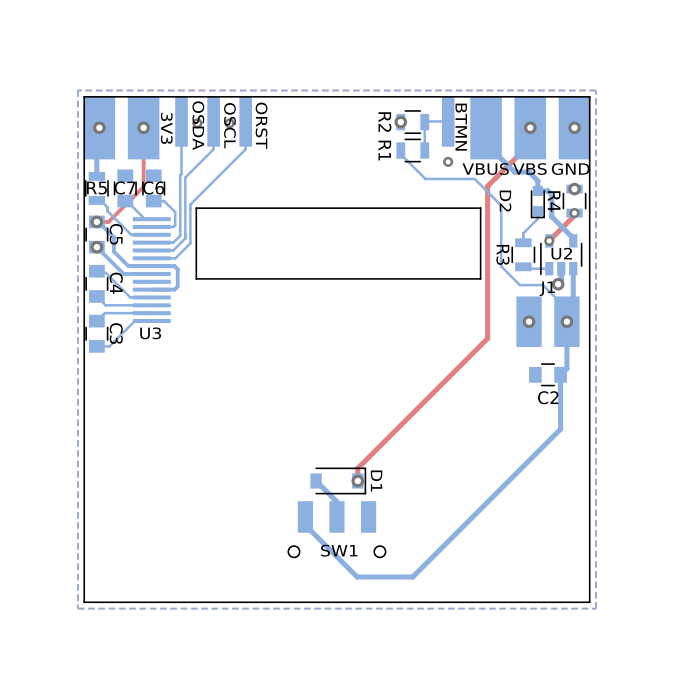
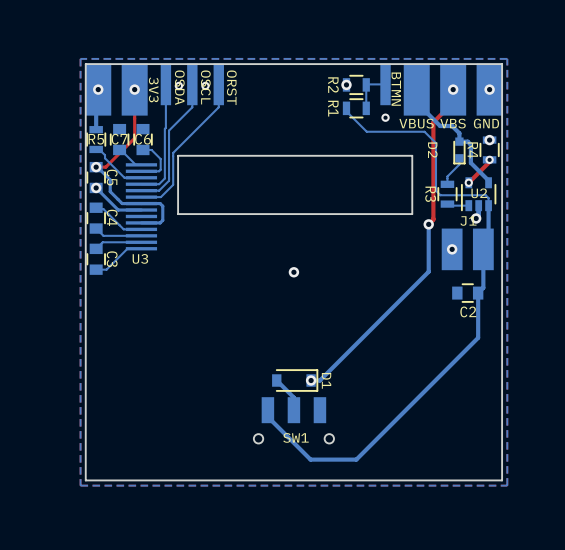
top track: (506, 167) (487, 186) (487, 338) (357, 468) (357, 480) -> (433, 122) (433, 219) (428, 224)
bottom track: (474, 178) (501, 205) (501, 266) (519, 285) (542, 285) (566, 309) -> (407, 131) (424, 131) (436, 143) (436, 190) (440, 195) (485, 195) (488, 198) (488, 205)
bottom track: none -> (428, 224) (428, 271) (319, 380) (311, 380)
via position: (566, 321) -> (428, 224)
via: none -> (293, 272)

